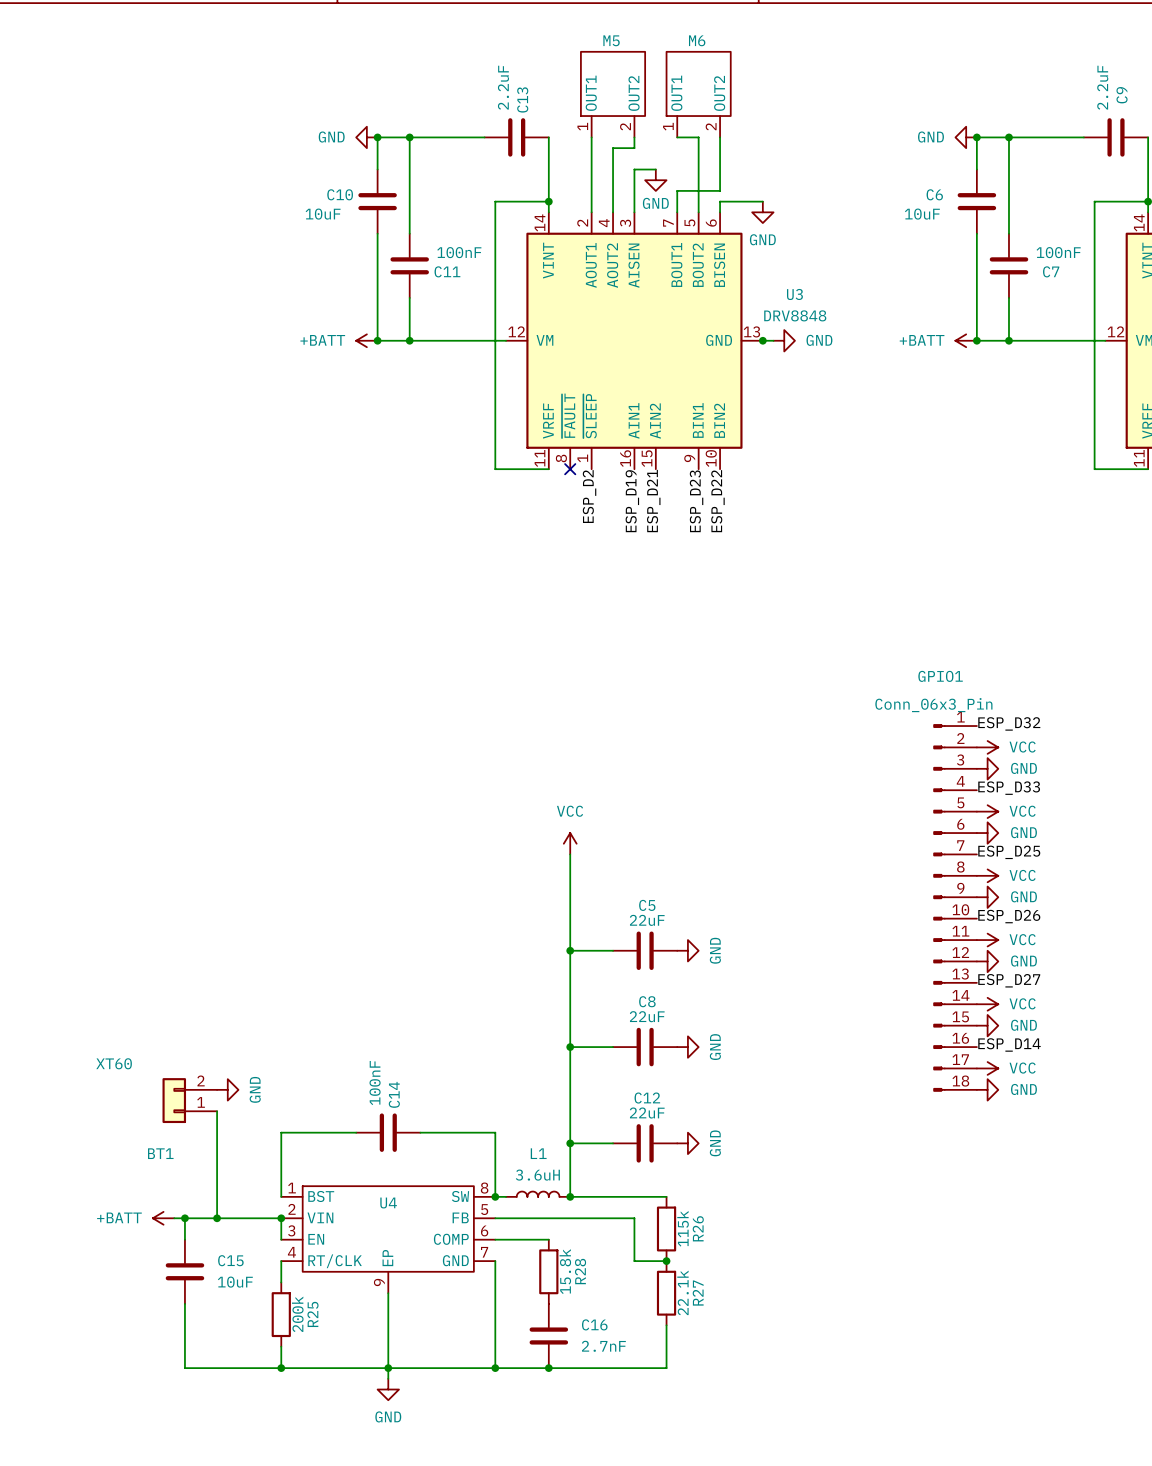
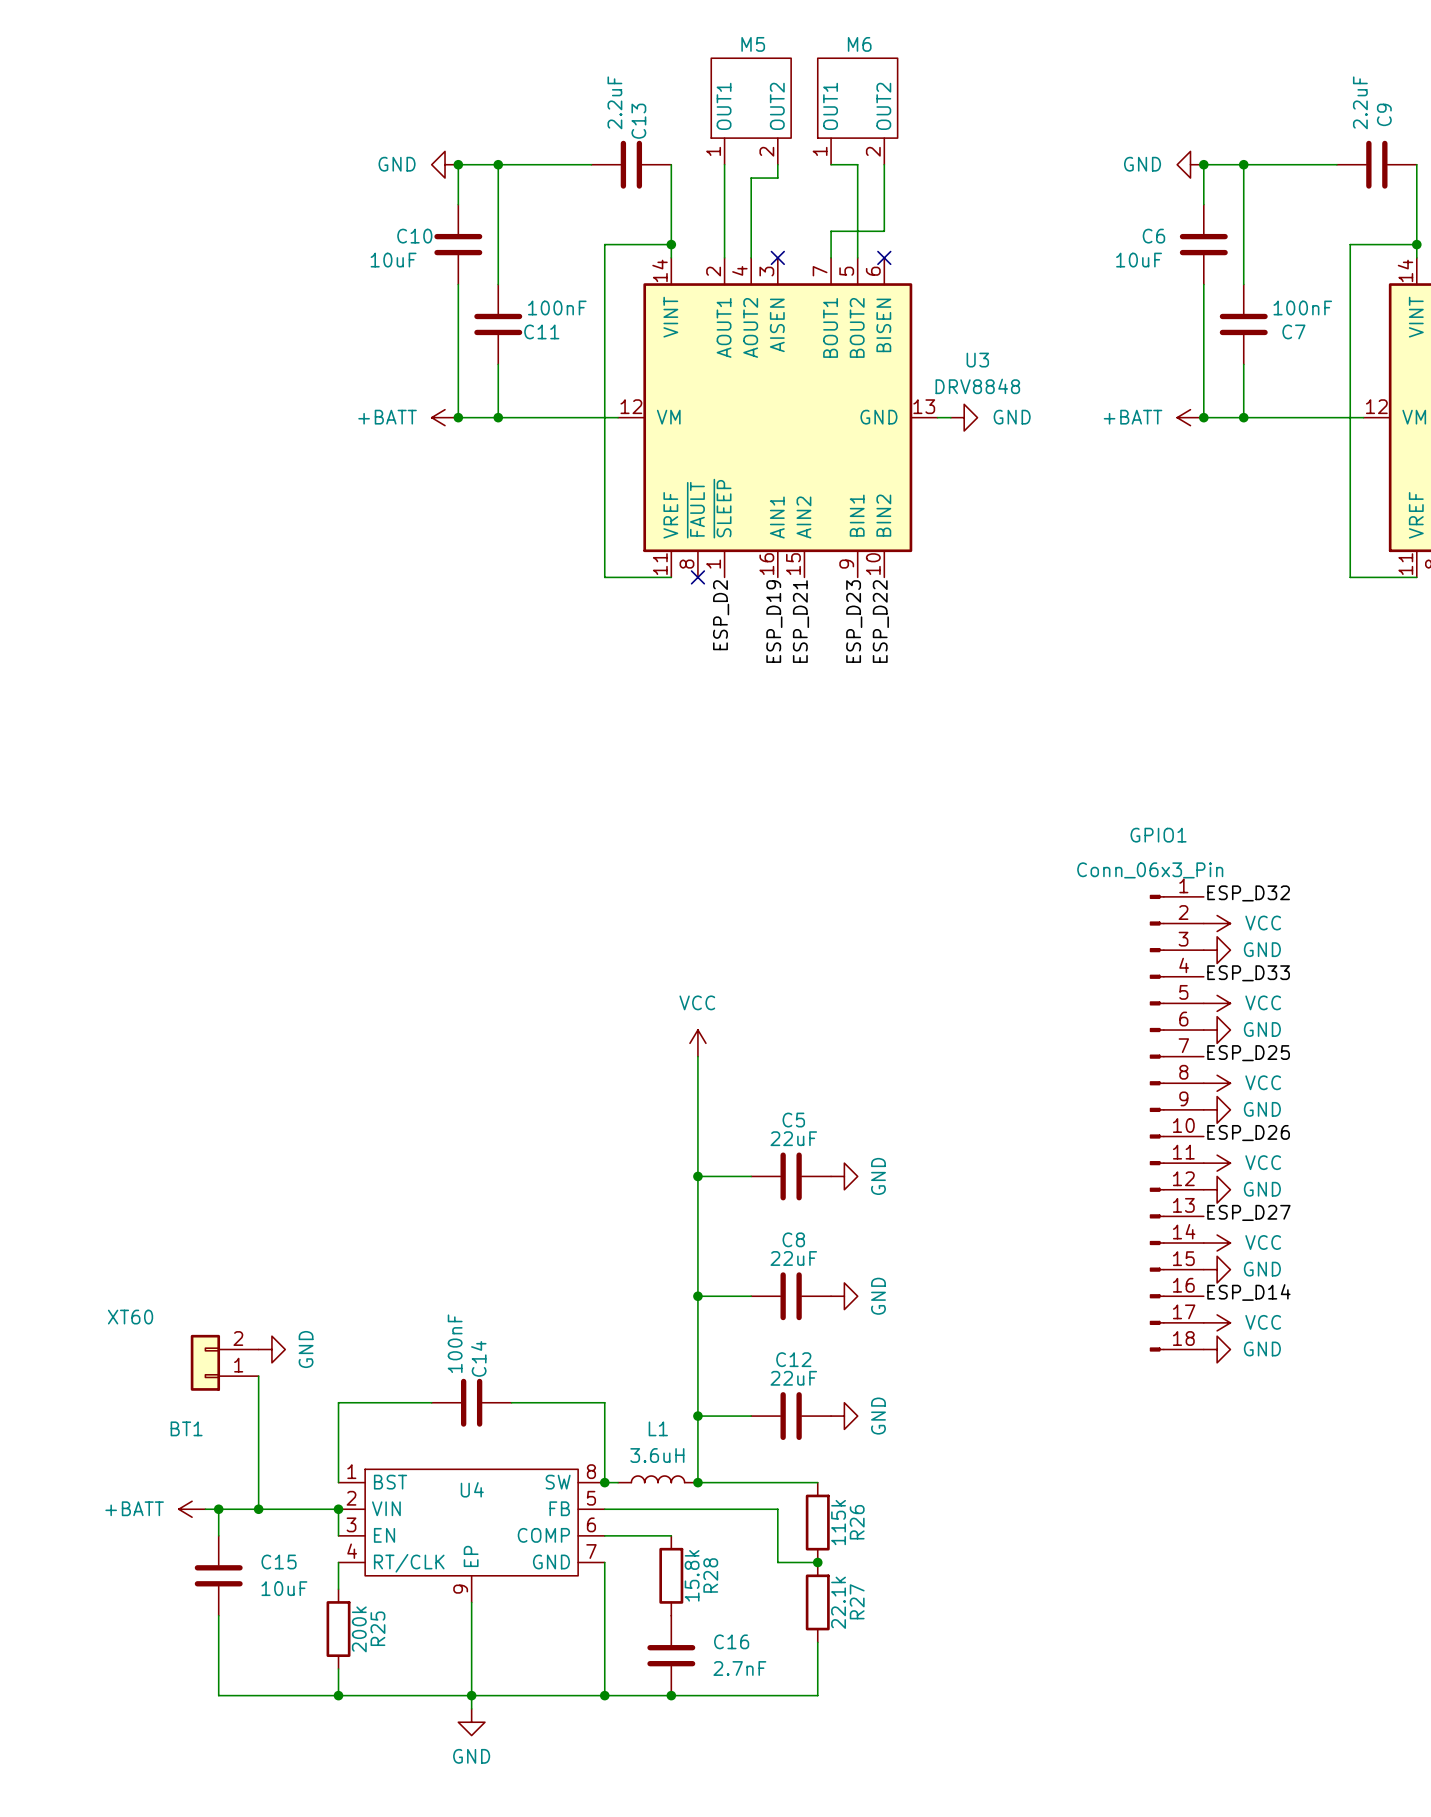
wire: (655, 169) (634, 169) (634, 212) -> none
power symbol: GND (655, 180) -> none
wire: (762, 201) (720, 201) (720, 212) -> none
no-connect mark: none -> (777, 257)
no-connect mark: none -> (884, 257)
power symbol: GND (762, 212) -> none
junction: (762, 340) -> none

